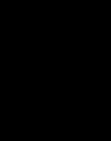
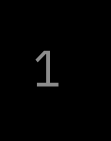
text: none -> 1 (46, 68)

